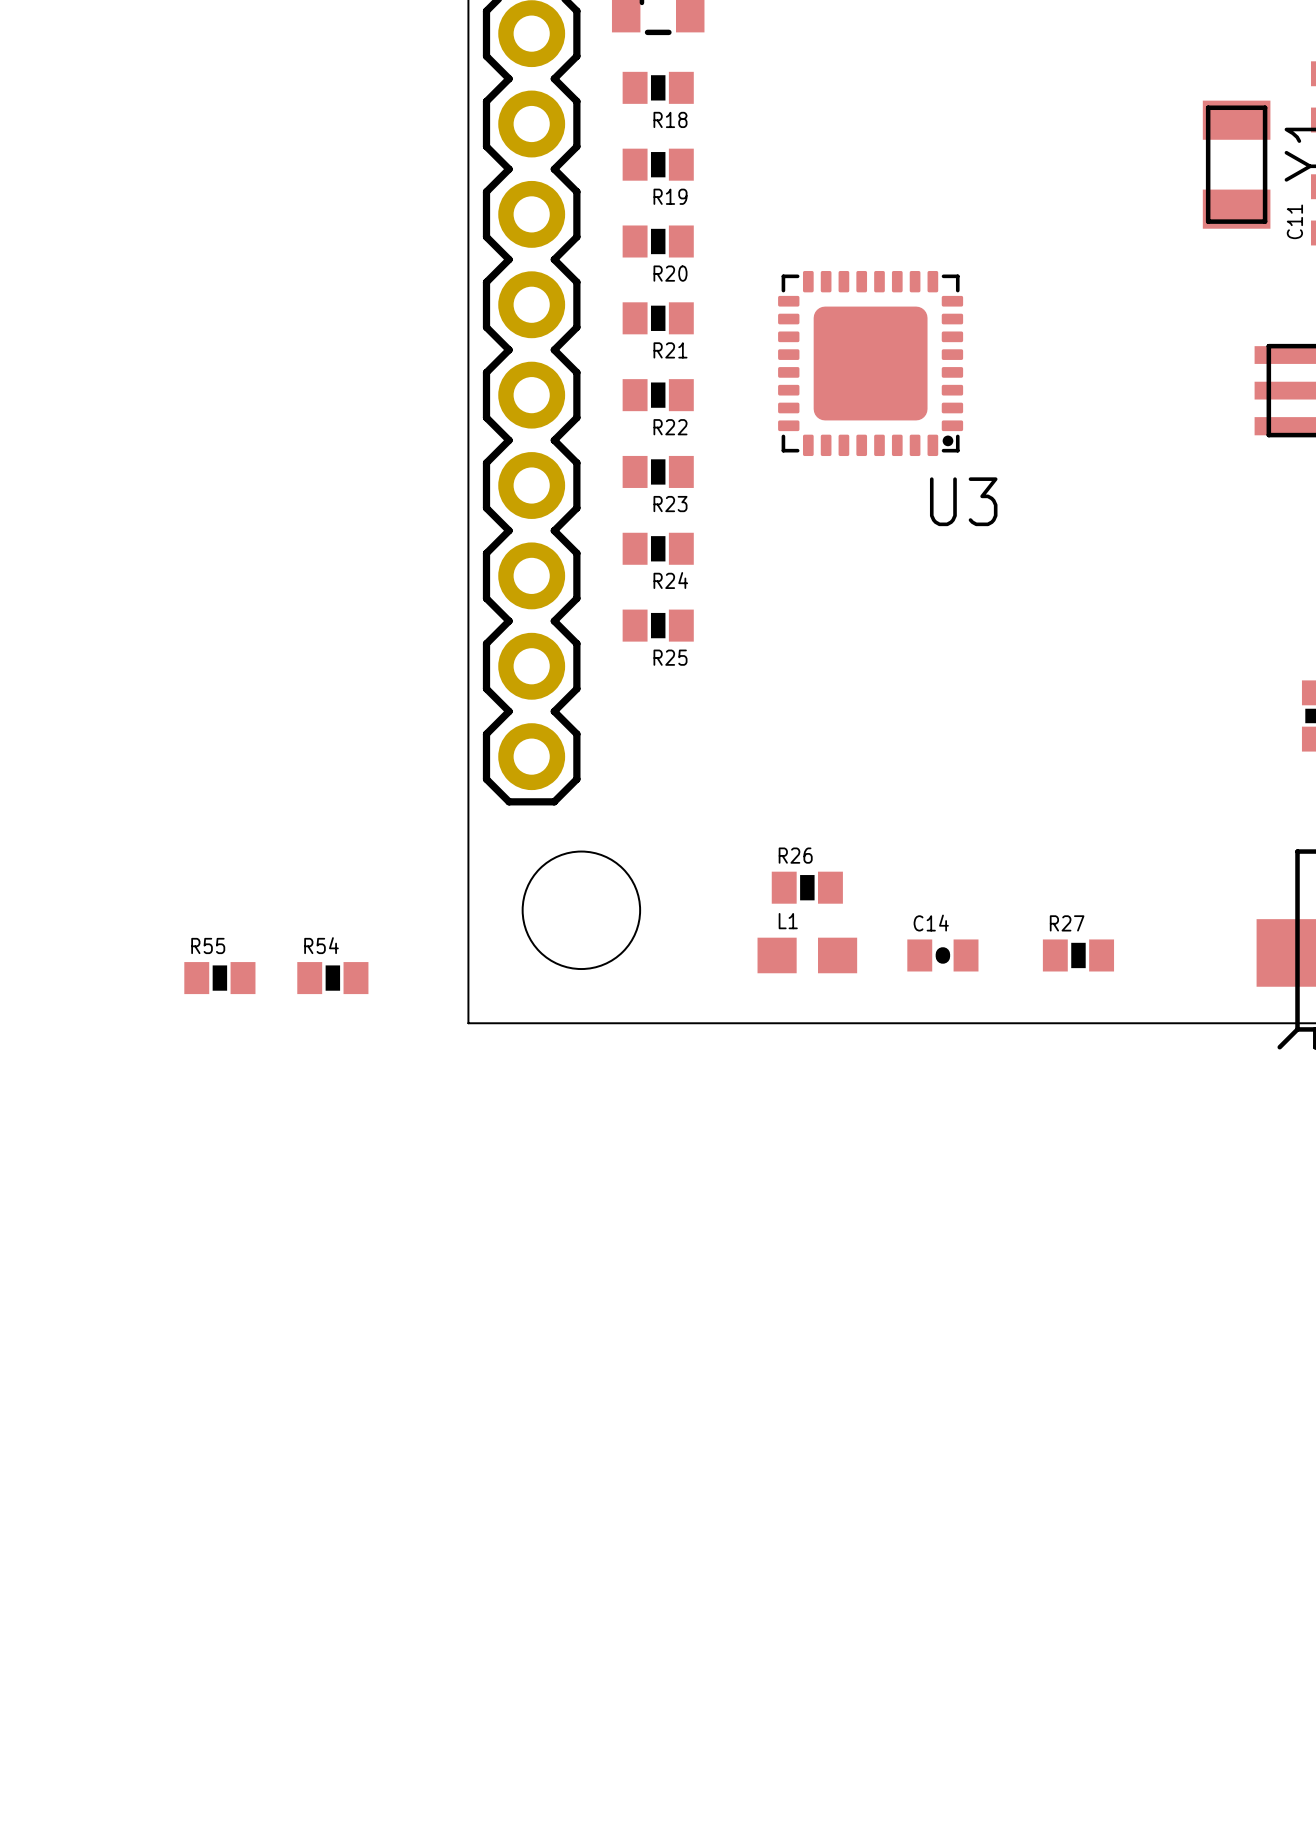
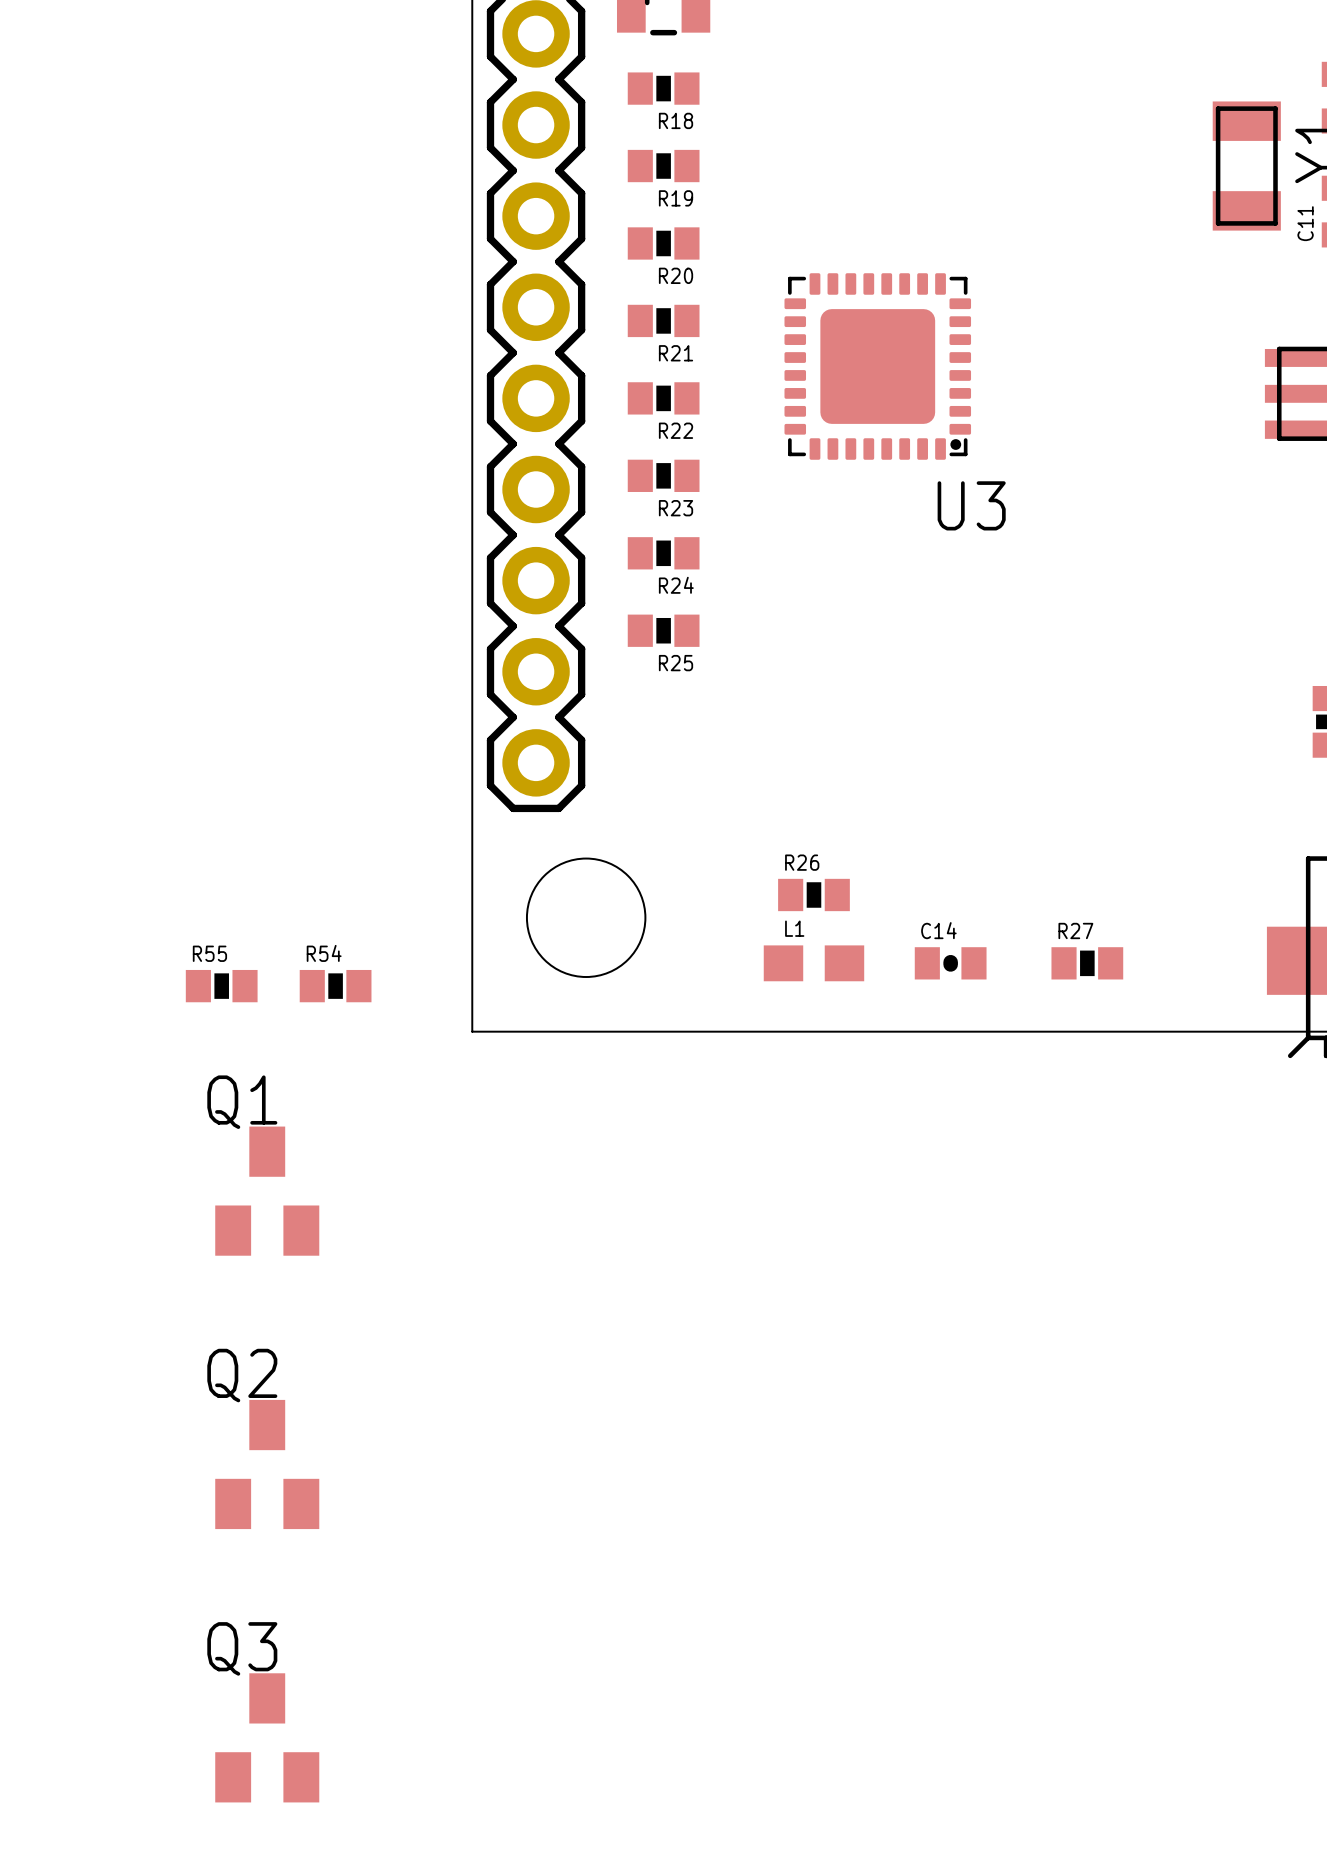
Q1: none -> (267, 1191)
Q2: none -> (267, 1464)
Q3: none -> (267, 1737)

